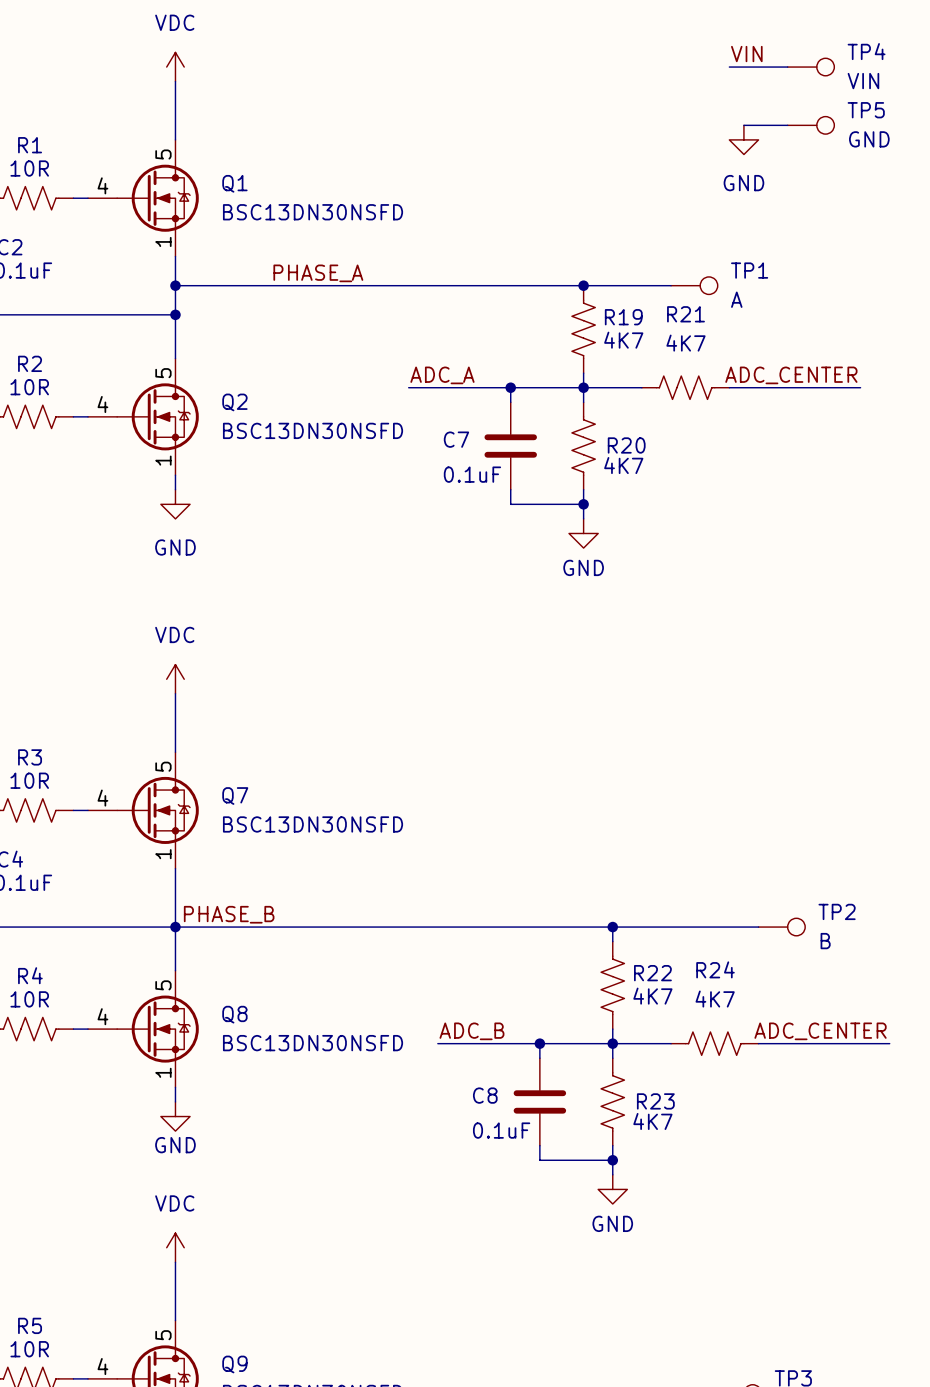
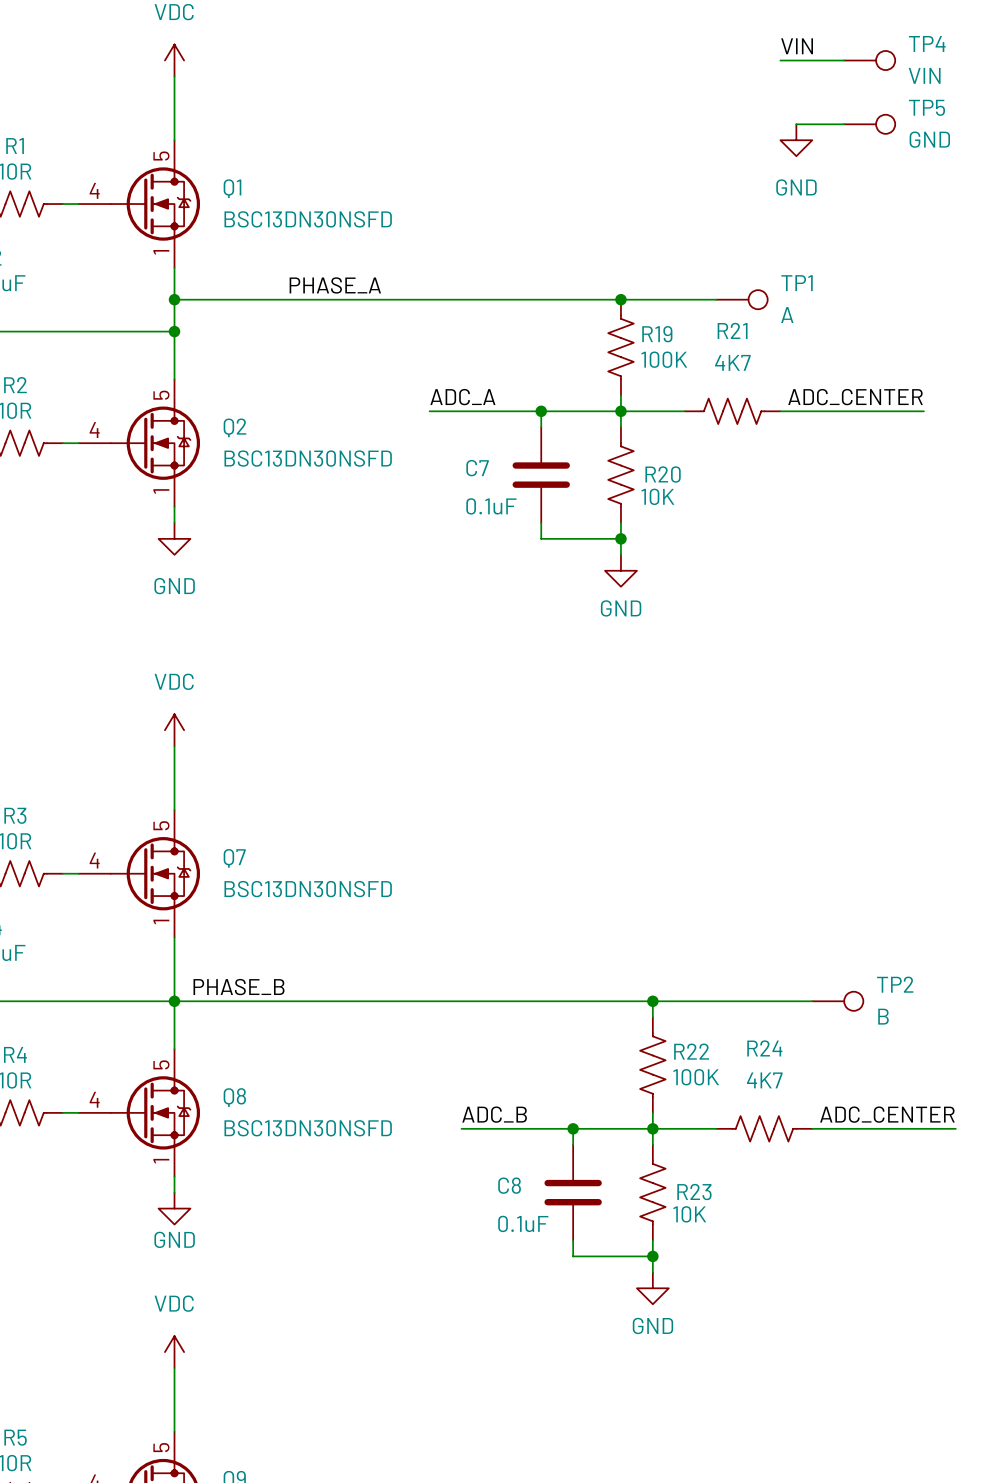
R19 value: 4K7 (623, 340) -> 100K (664, 359)
R20 value: 4K7 (623, 465) -> 10K (657, 496)
R22 value: 4K7 (652, 996) -> 100K (696, 1077)
R23 value: 4K7 (652, 1121) -> 10K (689, 1214)

